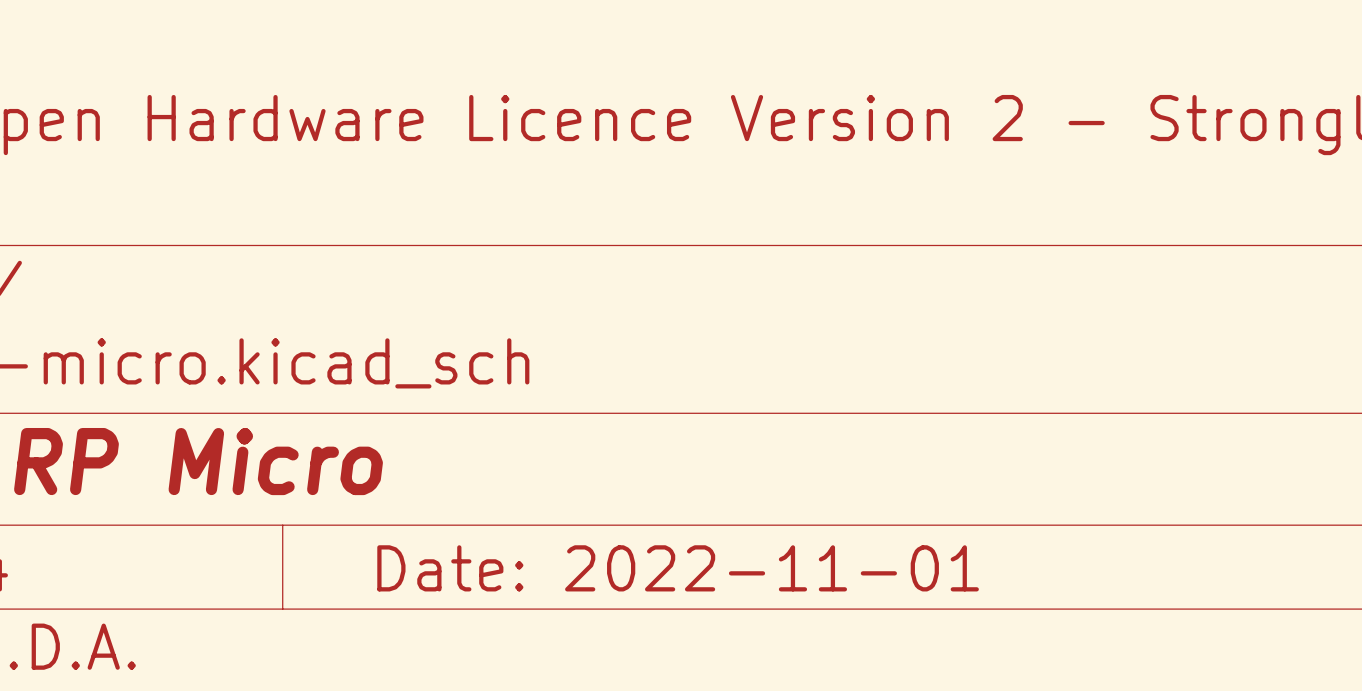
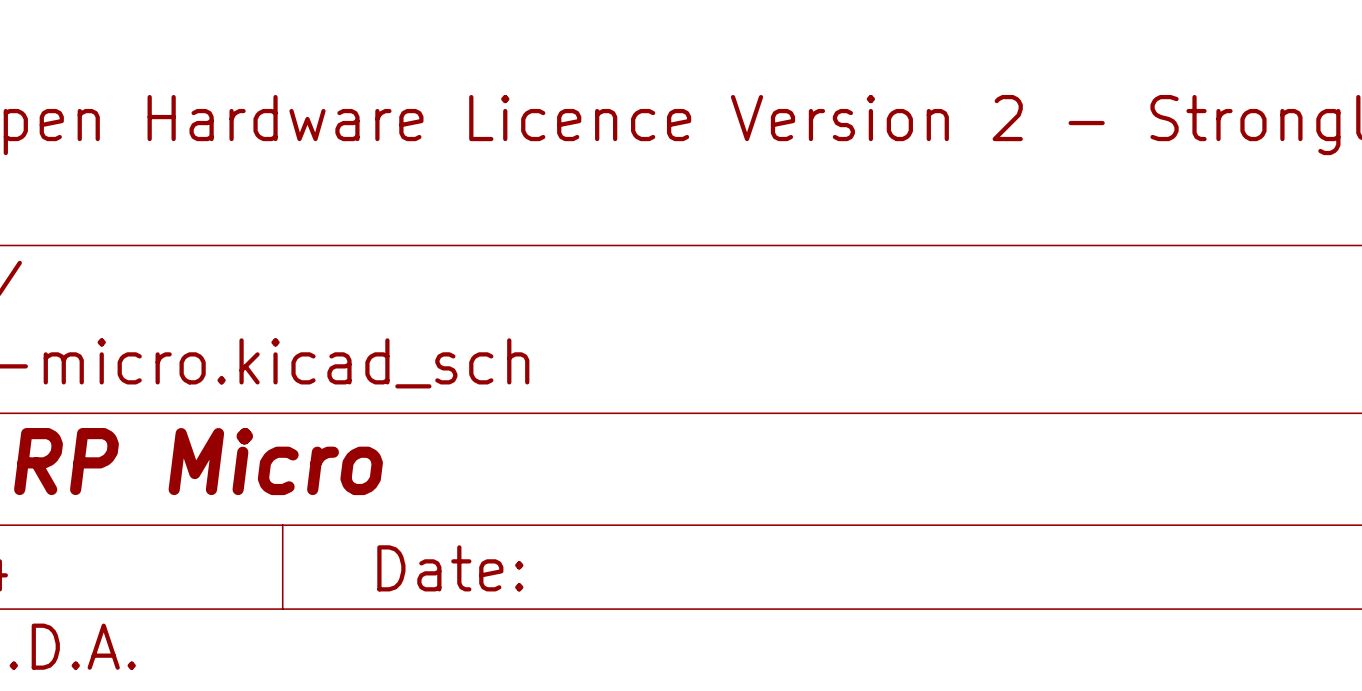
title block: Date: 2022-11-01 (678, 568) -> Date: (450, 568)

